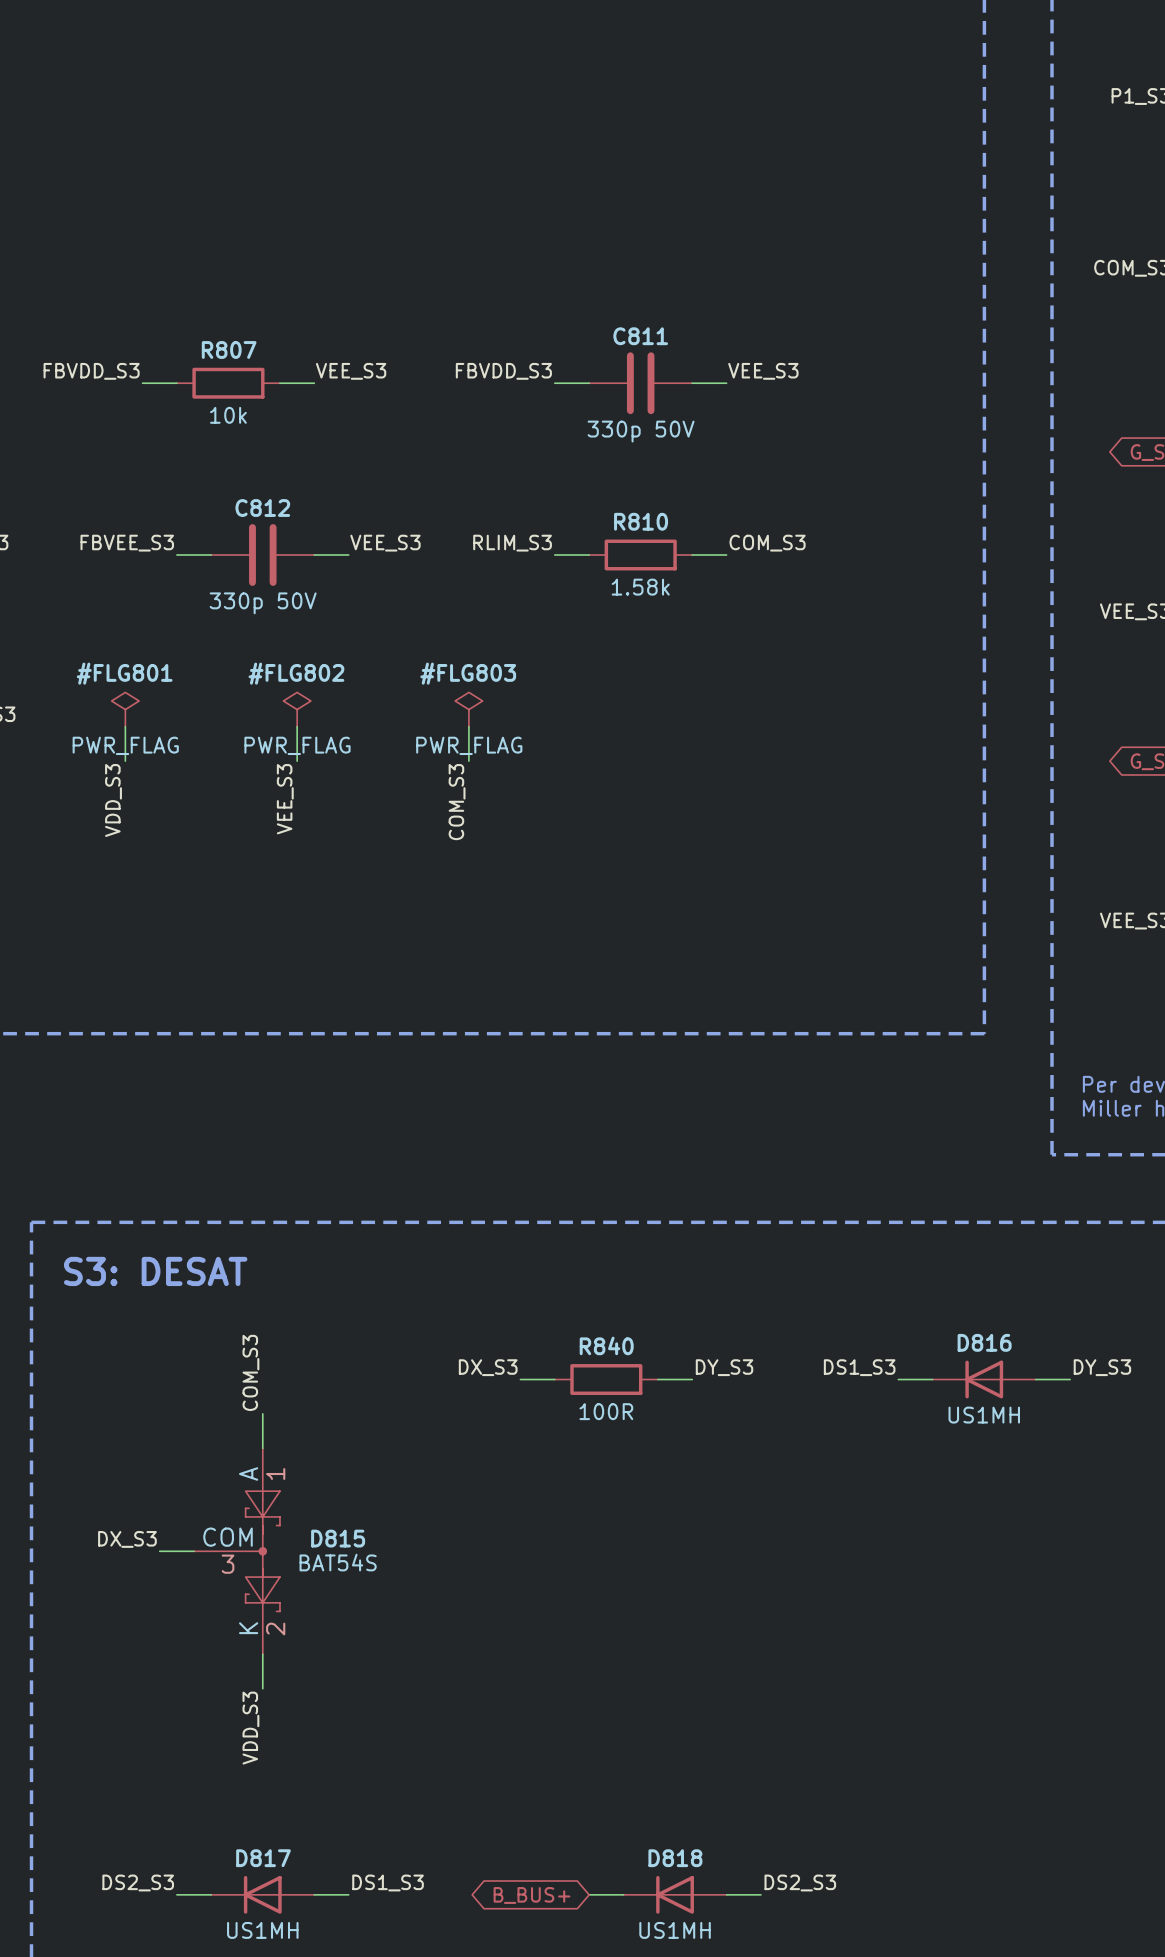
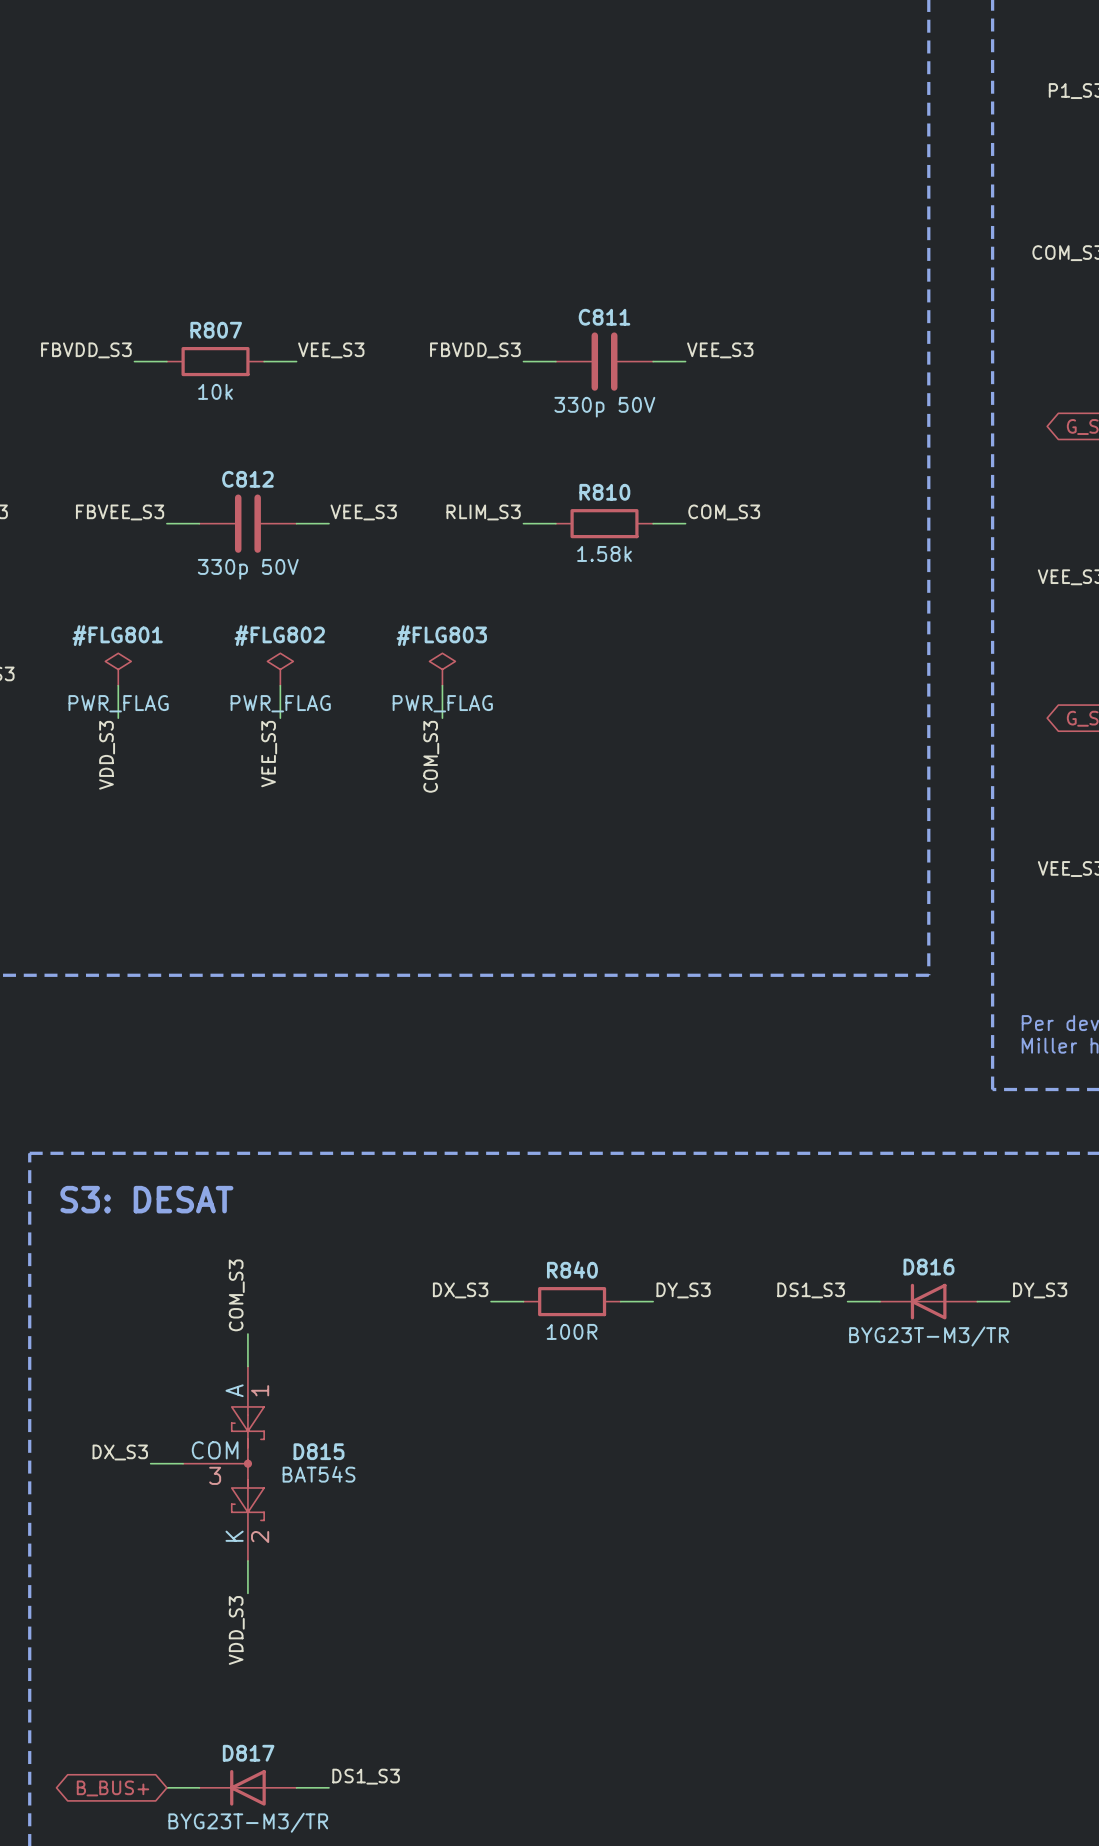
D816 value: US1MH (984, 1415) -> BYG23T-M3/TR (929, 1336)
label: DS2_S3 (138, 1882) -> none
label: DS2_S3 (800, 1882) -> none
wire: (589, 1894) (623, 1894) -> none
D818: US1MH (675, 1894) -> none
wire: (726, 1894) (760, 1894) -> none
global label: none -> B_BUS+ (112, 1788)
global label: B_BUS+ (532, 1895) -> none
D817 value: US1MH (262, 1930) -> BYG23T-M3/TR (248, 1822)

